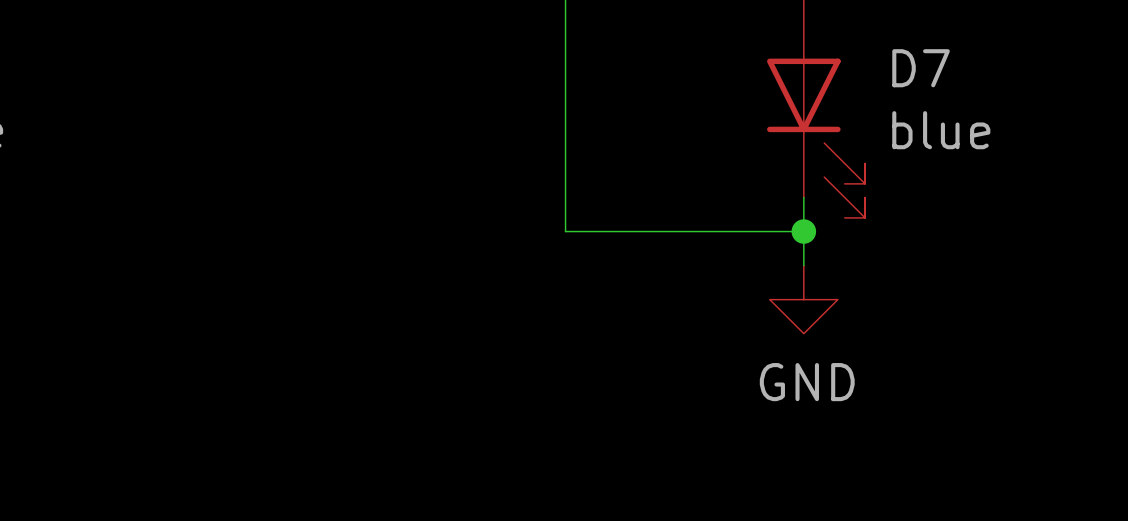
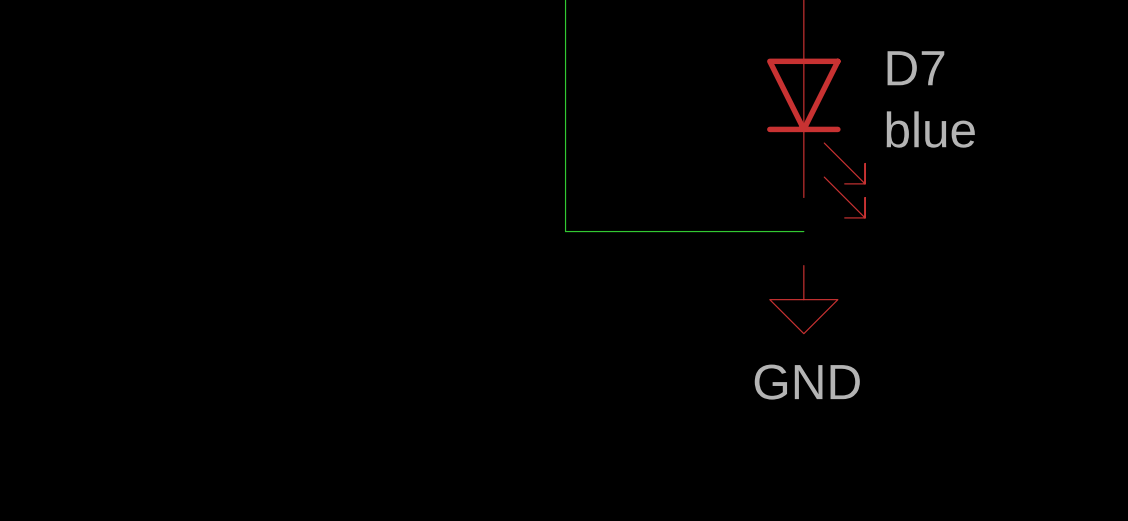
wire: (803, 197) (803, 265) -> none
junction: (803, 231) -> none

